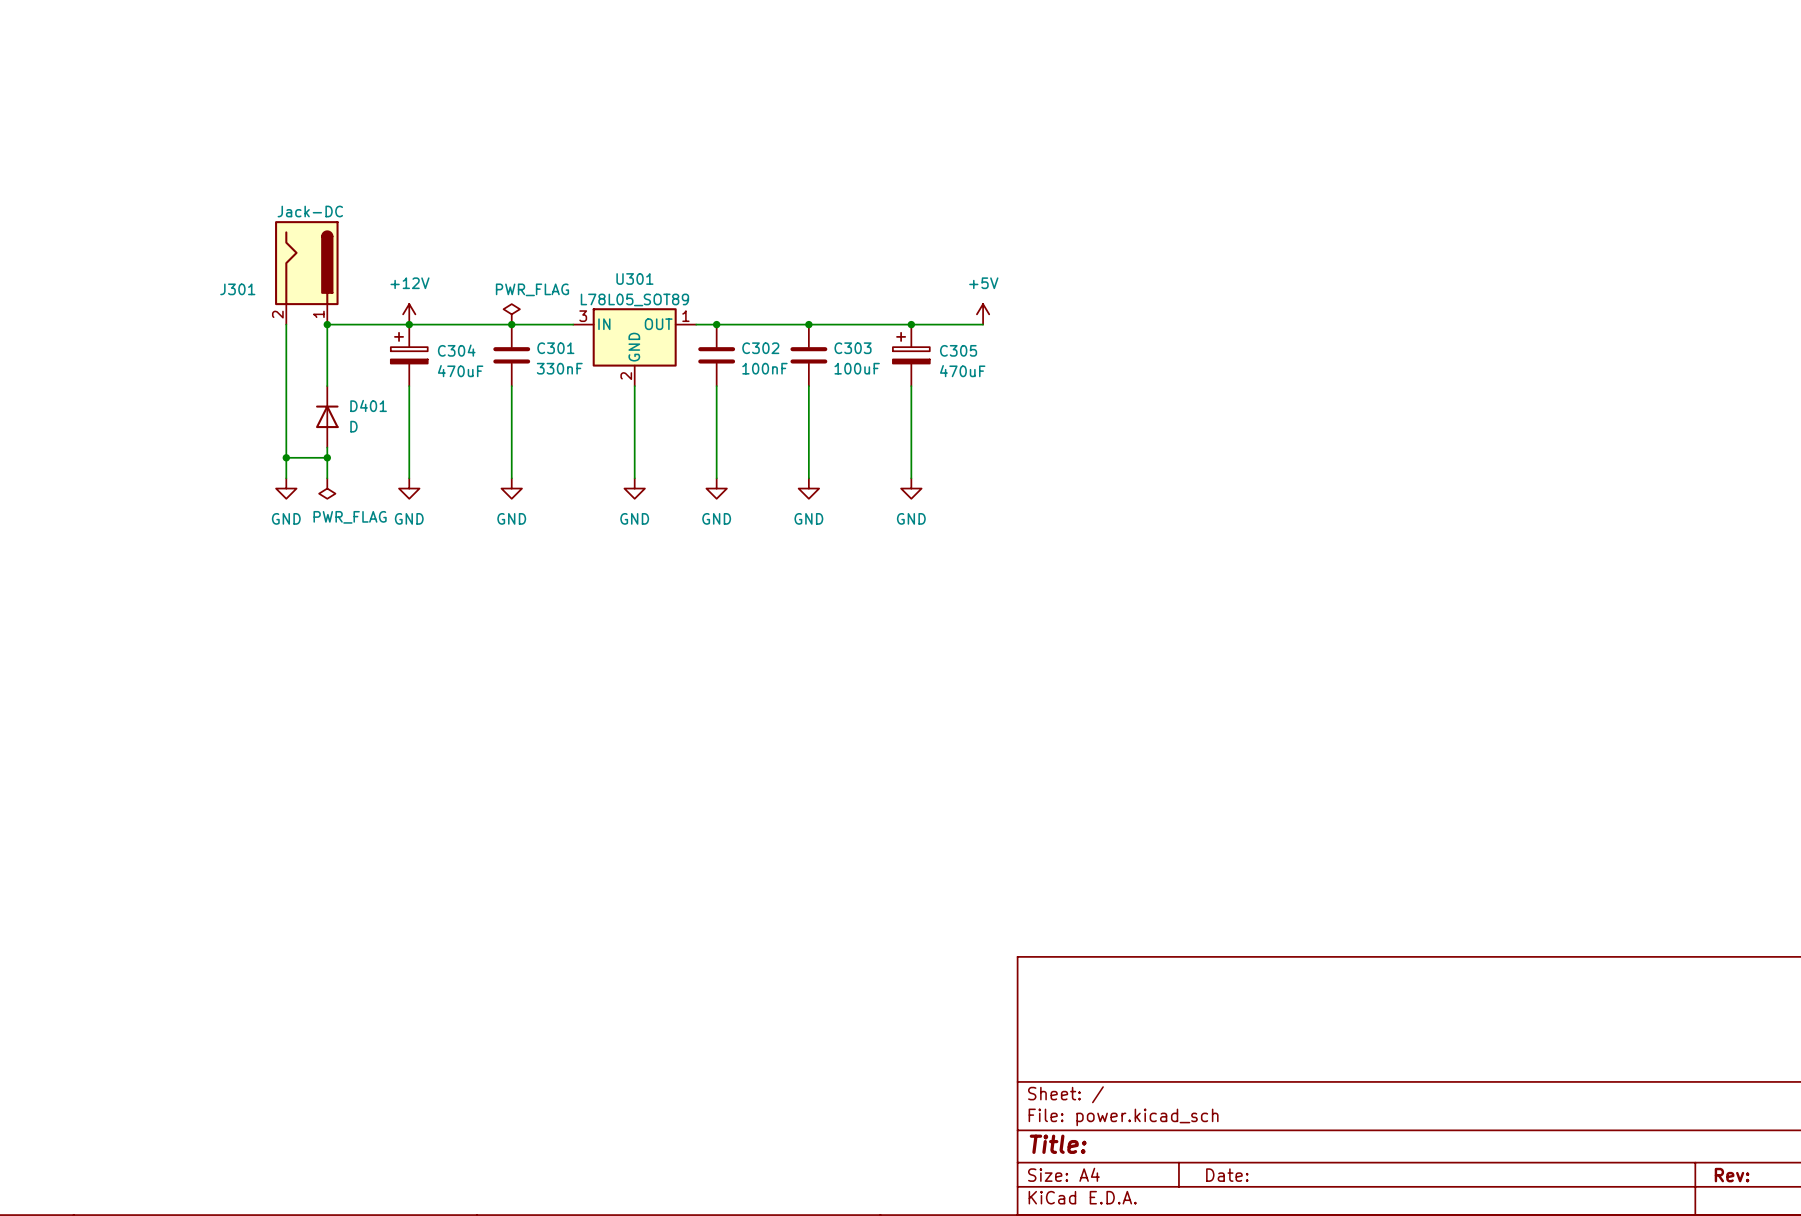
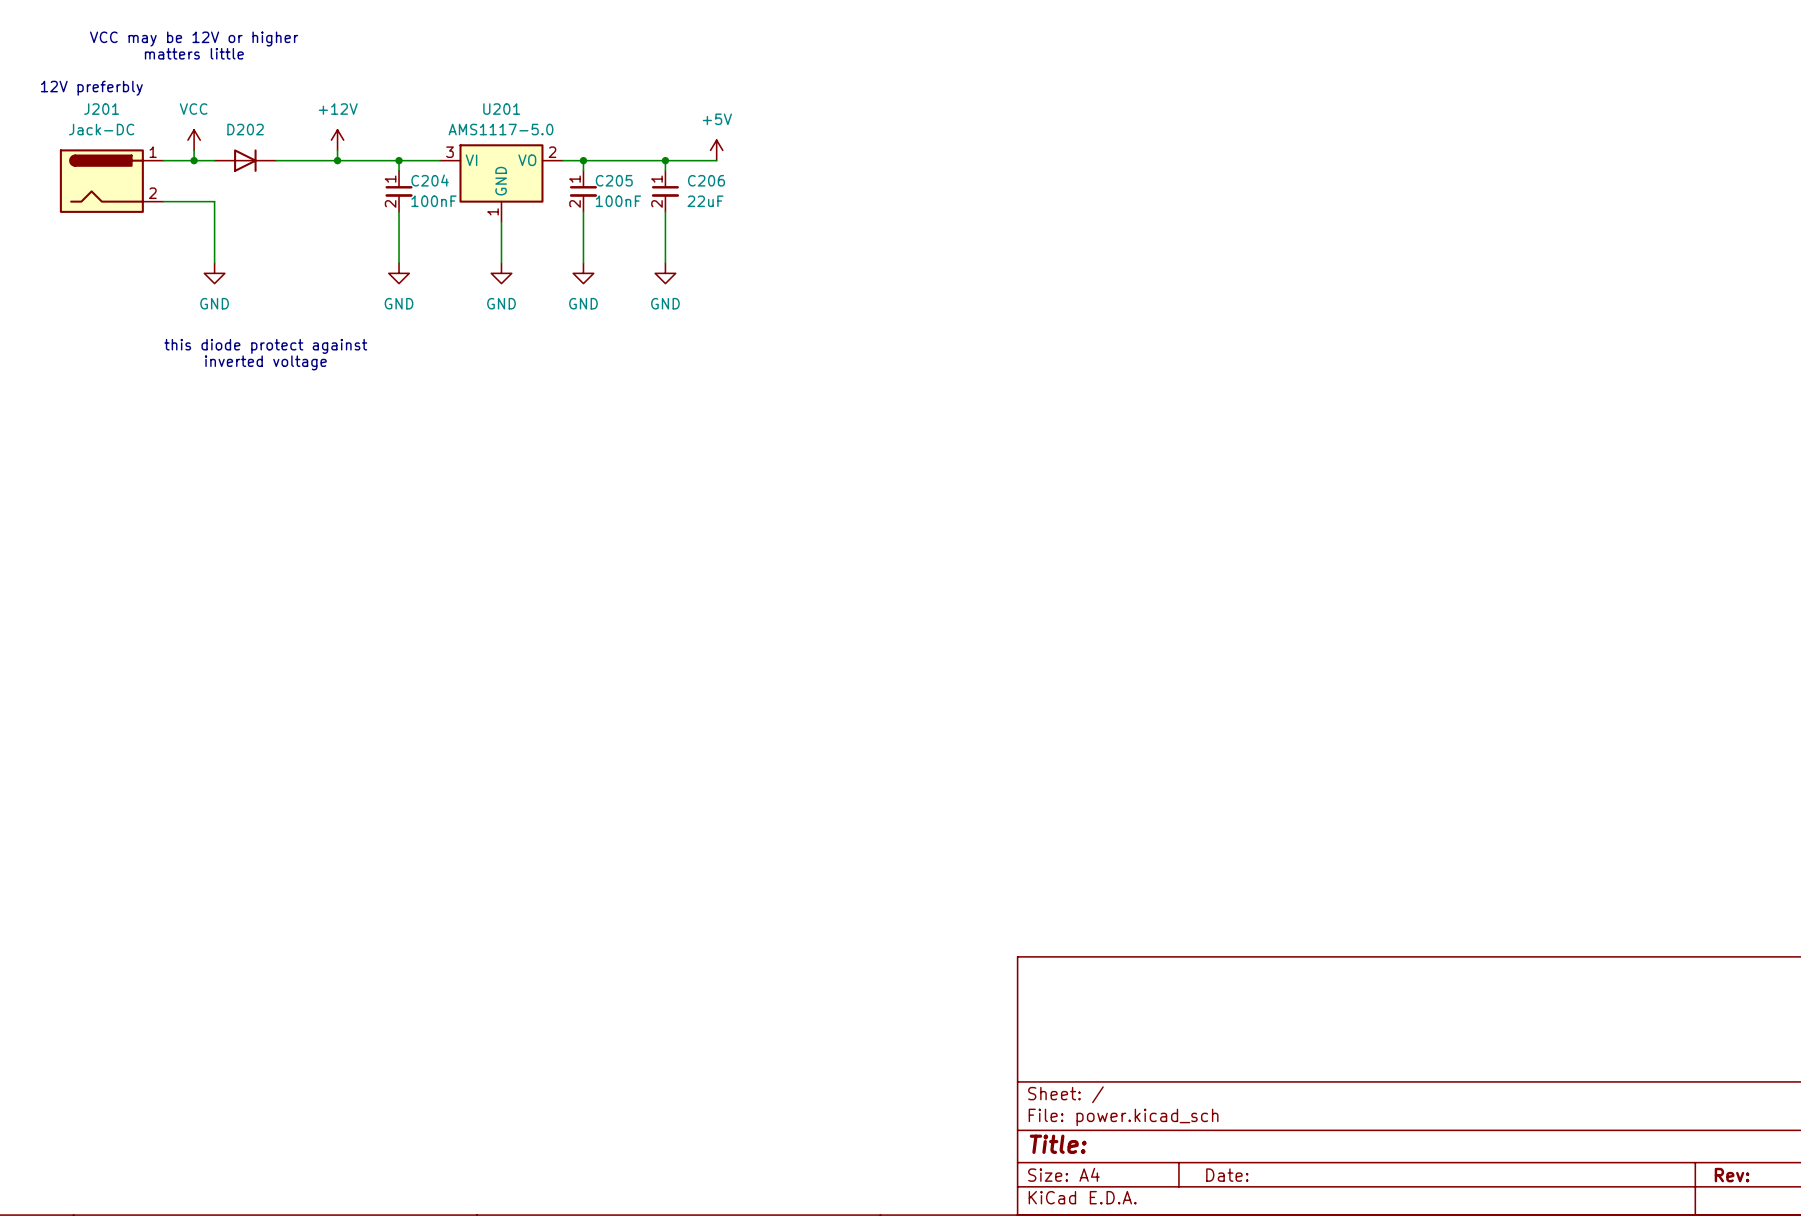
text: none -> VCC may be 12V or higher (194, 39)
text: none -> matters little (194, 53)
text: none -> 12V preferbly (91, 88)
power symbol: none -> VCC (194, 140)
wire: none -> (194, 150) (194, 160)
wire: none -> (337, 150) (337, 160)
power symbol: none -> +5V (716, 150)
wire: none -> (163, 160) (214, 160)
junction: none -> (194, 160)
D202: none -> (245, 160)
wire: none -> (276, 160) (440, 160)
junction: none -> (337, 160)
wire: none -> (399, 160) (399, 170)
junction: none -> (399, 160)
wire: none -> (562, 160) (716, 160)
wire: none -> (583, 160) (583, 170)
junction: none -> (583, 160)
wire: none -> (665, 160) (665, 170)
junction: none -> (665, 160)
J201: none -> Jack-DC (111, 181)
U201: none -> AMS1117-5.0 (501, 183)
C204: none -> 100nF (399, 191)
C205: none -> 100nF (583, 191)
C206: none -> 22uF (665, 191)
wire: none -> (163, 201) (214, 201) (214, 263)
wire: none -> (399, 211) (399, 263)
wire: none -> (583, 211) (583, 263)
wire: none -> (665, 211) (665, 263)
wire: none -> (501, 222) (501, 263)
J301: Jack-DC (306, 272) -> none
power symbol: none -> GND (214, 273)
power symbol: none -> GND (399, 273)
power symbol: none -> GND (501, 273)
power symbol: none -> GND (583, 273)
power symbol: none -> GND (665, 273)
power symbol position: +12V (409, 314) -> +12V (337, 140)
power symbol: PWR_FLAG (511, 314) -> none
power symbol: +5V (983, 314) -> none
wire: (286, 324) (286, 478) -> none
junction: (327, 324) -> none
junction: (409, 324) -> none
junction: (511, 324) -> none
wire: (573, 324) (327, 324) (327, 386) -> none
wire: (696, 324) (983, 324) -> none
junction: (716, 324) -> none
junction: (808, 324) -> none
junction: (911, 324) -> none
text: none -> this diode protect against (265, 346)
U301: L78L05_SOT89 (634, 347) -> none
C304: 470uF (409, 355) -> none
C301: 330nF (511, 355) -> none
C302: 100nF (716, 355) -> none
C303: 100uF (808, 355) -> none
C305: 470uF (911, 355) -> none
text: none -> inverted voltage (265, 362)
wire: (409, 386) (409, 478) -> none
wire: (511, 386) (511, 478) -> none
wire: (634, 386) (634, 478) -> none
wire: (716, 386) (716, 478) -> none
wire: (808, 386) (808, 478) -> none
wire: (911, 386) (911, 478) -> none
D401: D (327, 416) -> none
wire: (327, 447) (327, 478) -> none
wire: (286, 457) (327, 457) -> none
junction: (286, 457) -> none
junction: (327, 457) -> none
power symbol: GND (286, 488) -> none
power symbol: PWR_FLAG (327, 488) -> none
power symbol: GND (409, 488) -> none
power symbol: GND (511, 488) -> none
power symbol: GND (634, 488) -> none
power symbol: GND (716, 488) -> none
power symbol: GND (808, 488) -> none
power symbol: GND (911, 488) -> none

